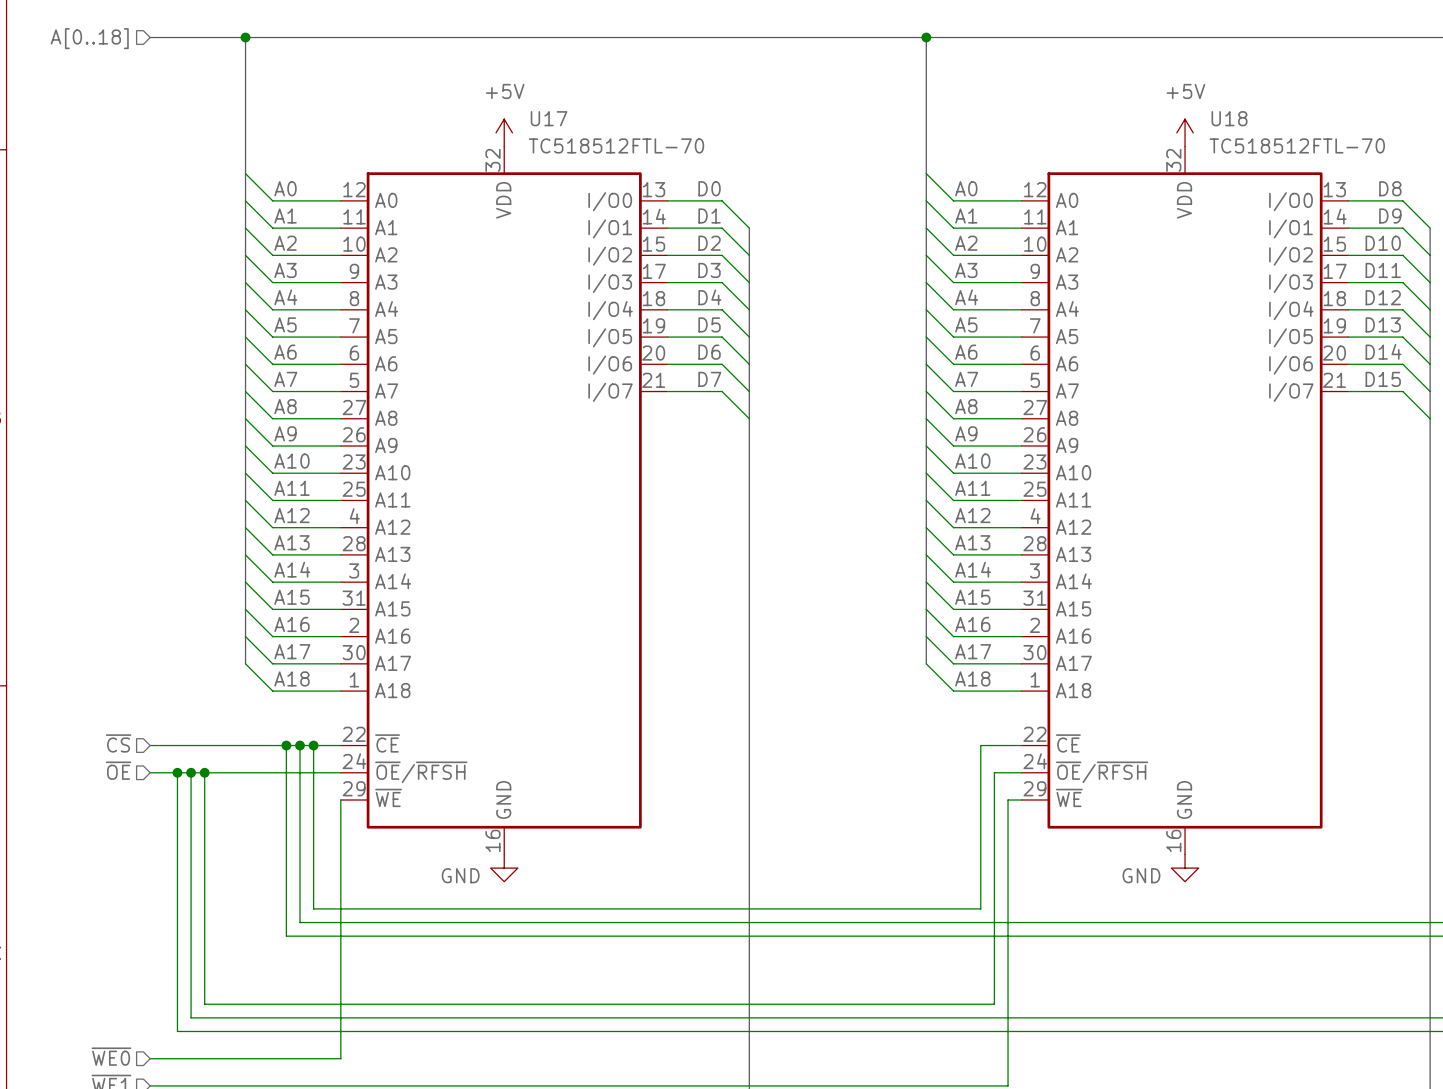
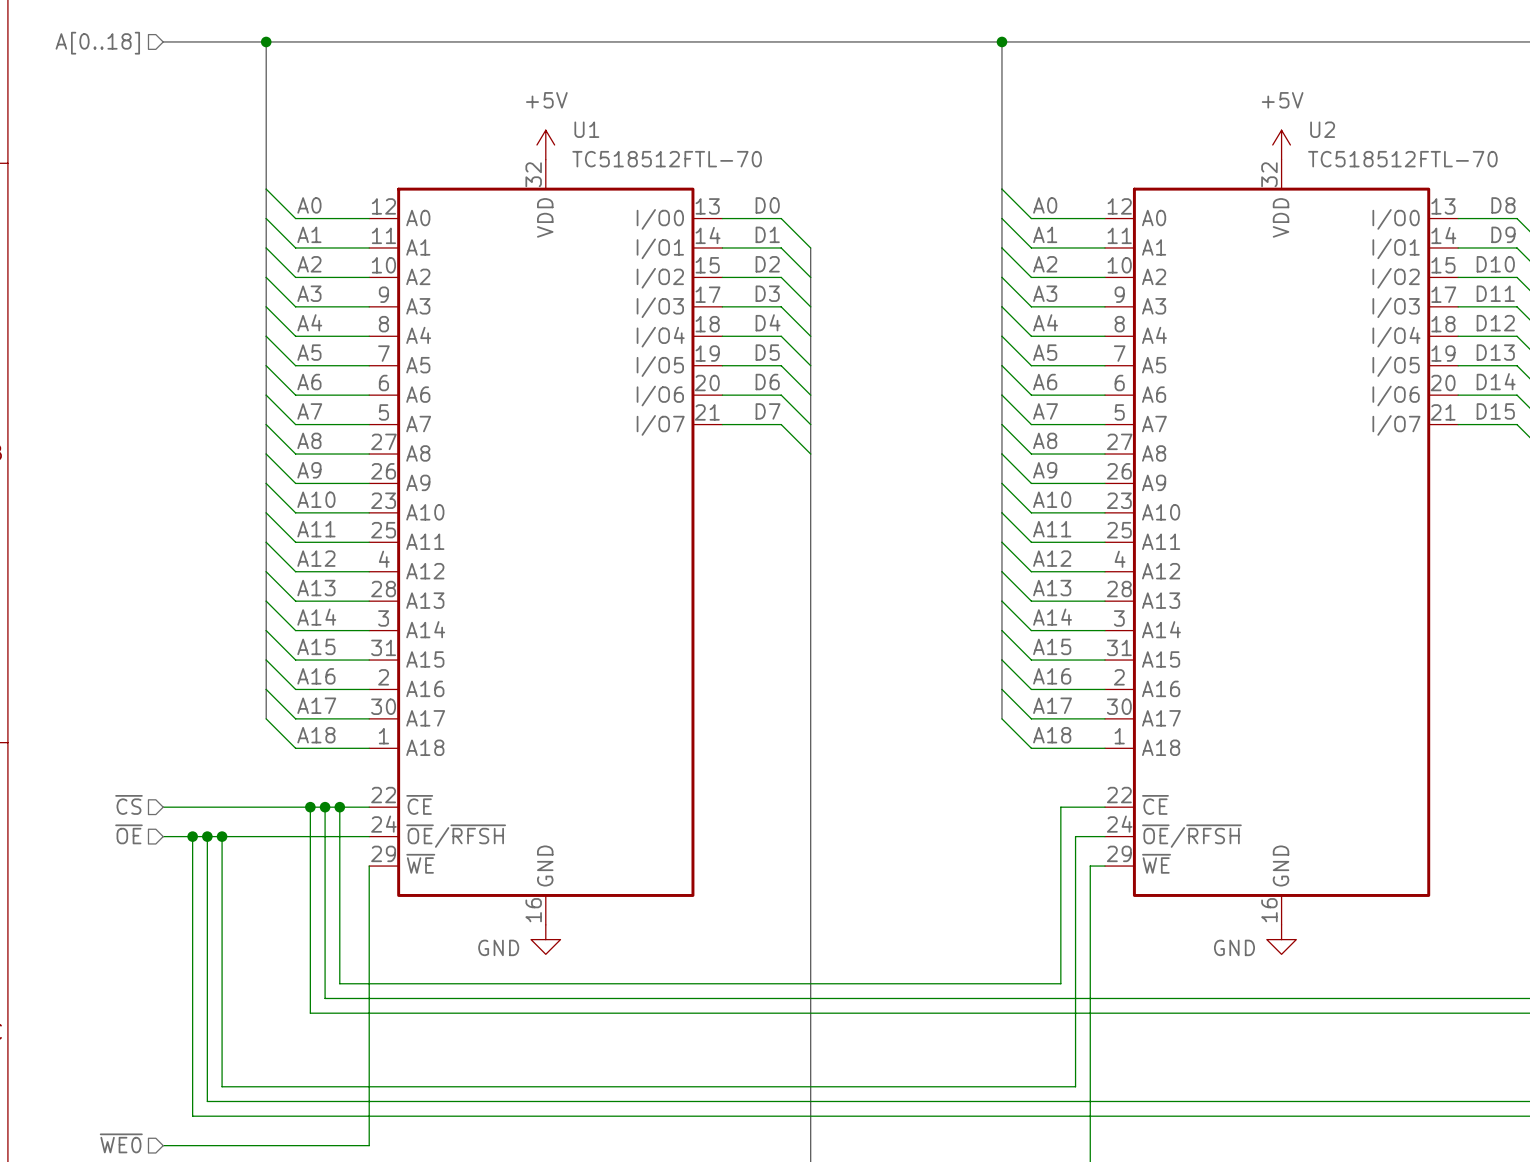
U17 name: U17 (549, 118) -> U1 (586, 129)
U18 name: U18 (1229, 118) -> U2 (1322, 129)

